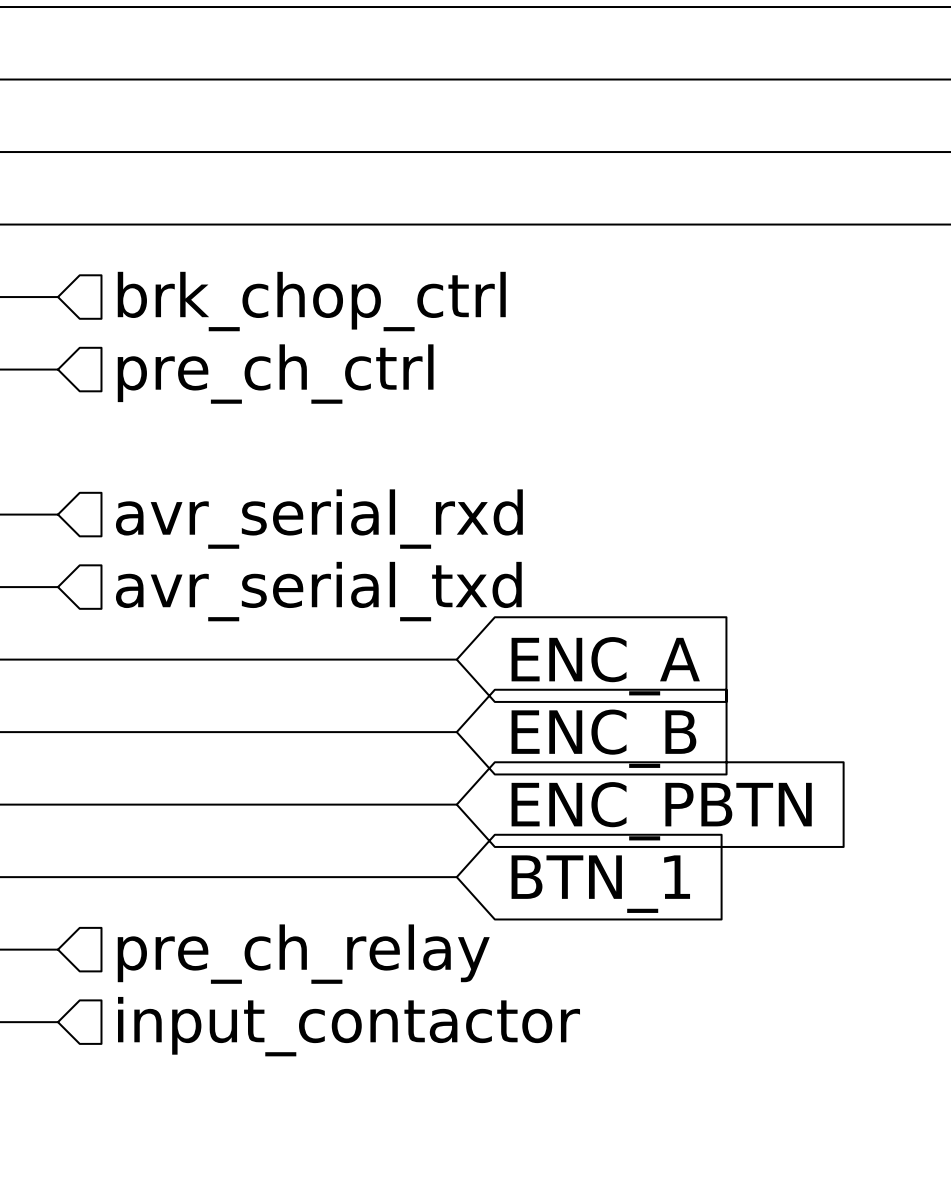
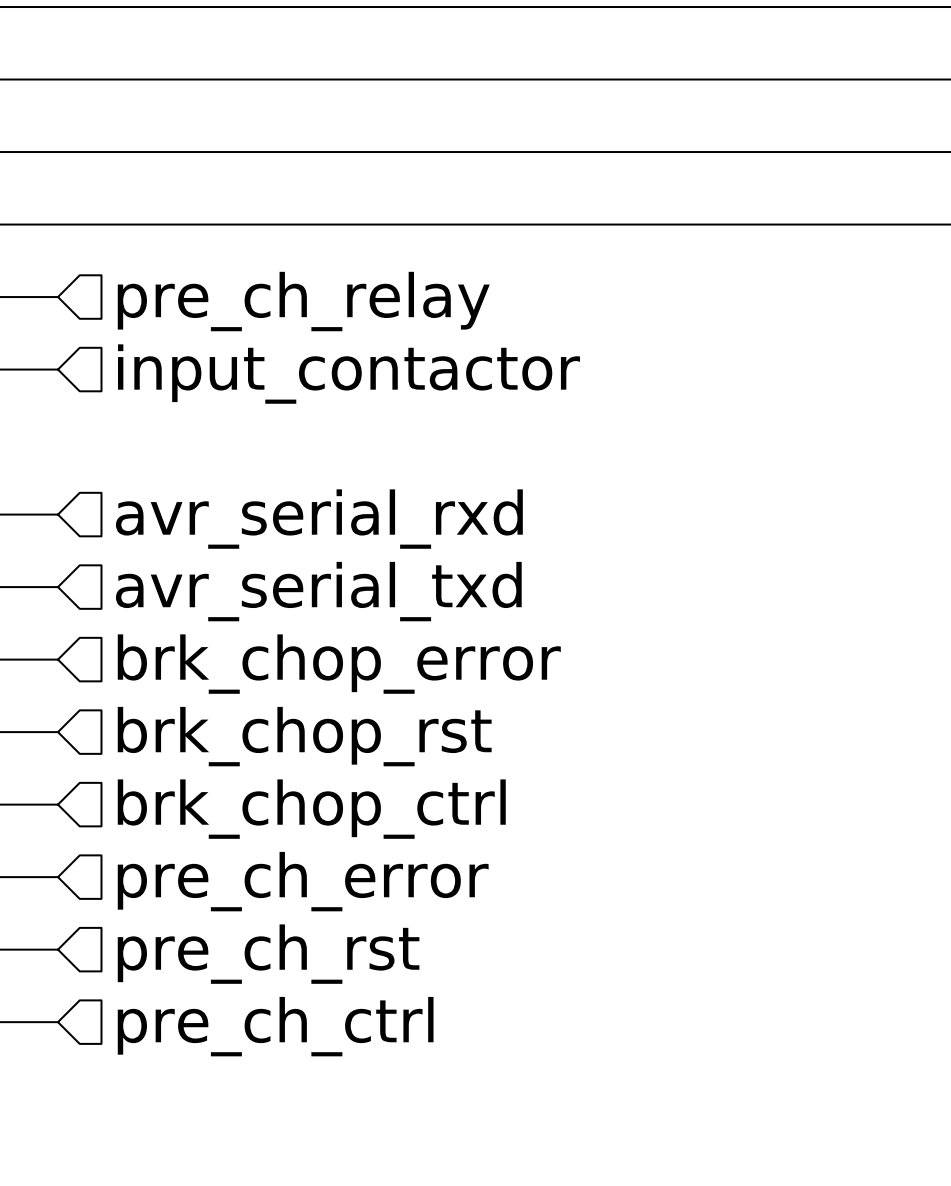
hierarchical label: brk_chop_ctrl (311, 301) -> pre_ch_relay (303, 301)
hierarchical label: pre_ch_ctrl (275, 374) -> input_contactor (349, 374)
wire: (57, 659) (456, 659) -> none
hierarchical label: none -> brk_chop_error (339, 664)
global label: ENC_A (605, 666) -> none
wire: (57, 732) (456, 732) -> none
hierarchical label: none -> brk_chop_rst (304, 736)
global label: ENC_B (603, 738) -> none
wire: (57, 804) (456, 804) -> none
hierarchical label: none -> brk_chop_ctrl (311, 809)
global label: ENC_PBTN (661, 811) -> none
wire: (57, 877) (456, 877) -> none
hierarchical label: none -> pre_ch_error (303, 881)
global label: BTN_1 (600, 884) -> none
hierarchical label: pre_ch_relay (303, 954) -> pre_ch_rst (268, 954)
hierarchical label: input_contactor (349, 1026) -> pre_ch_ctrl (275, 1026)

